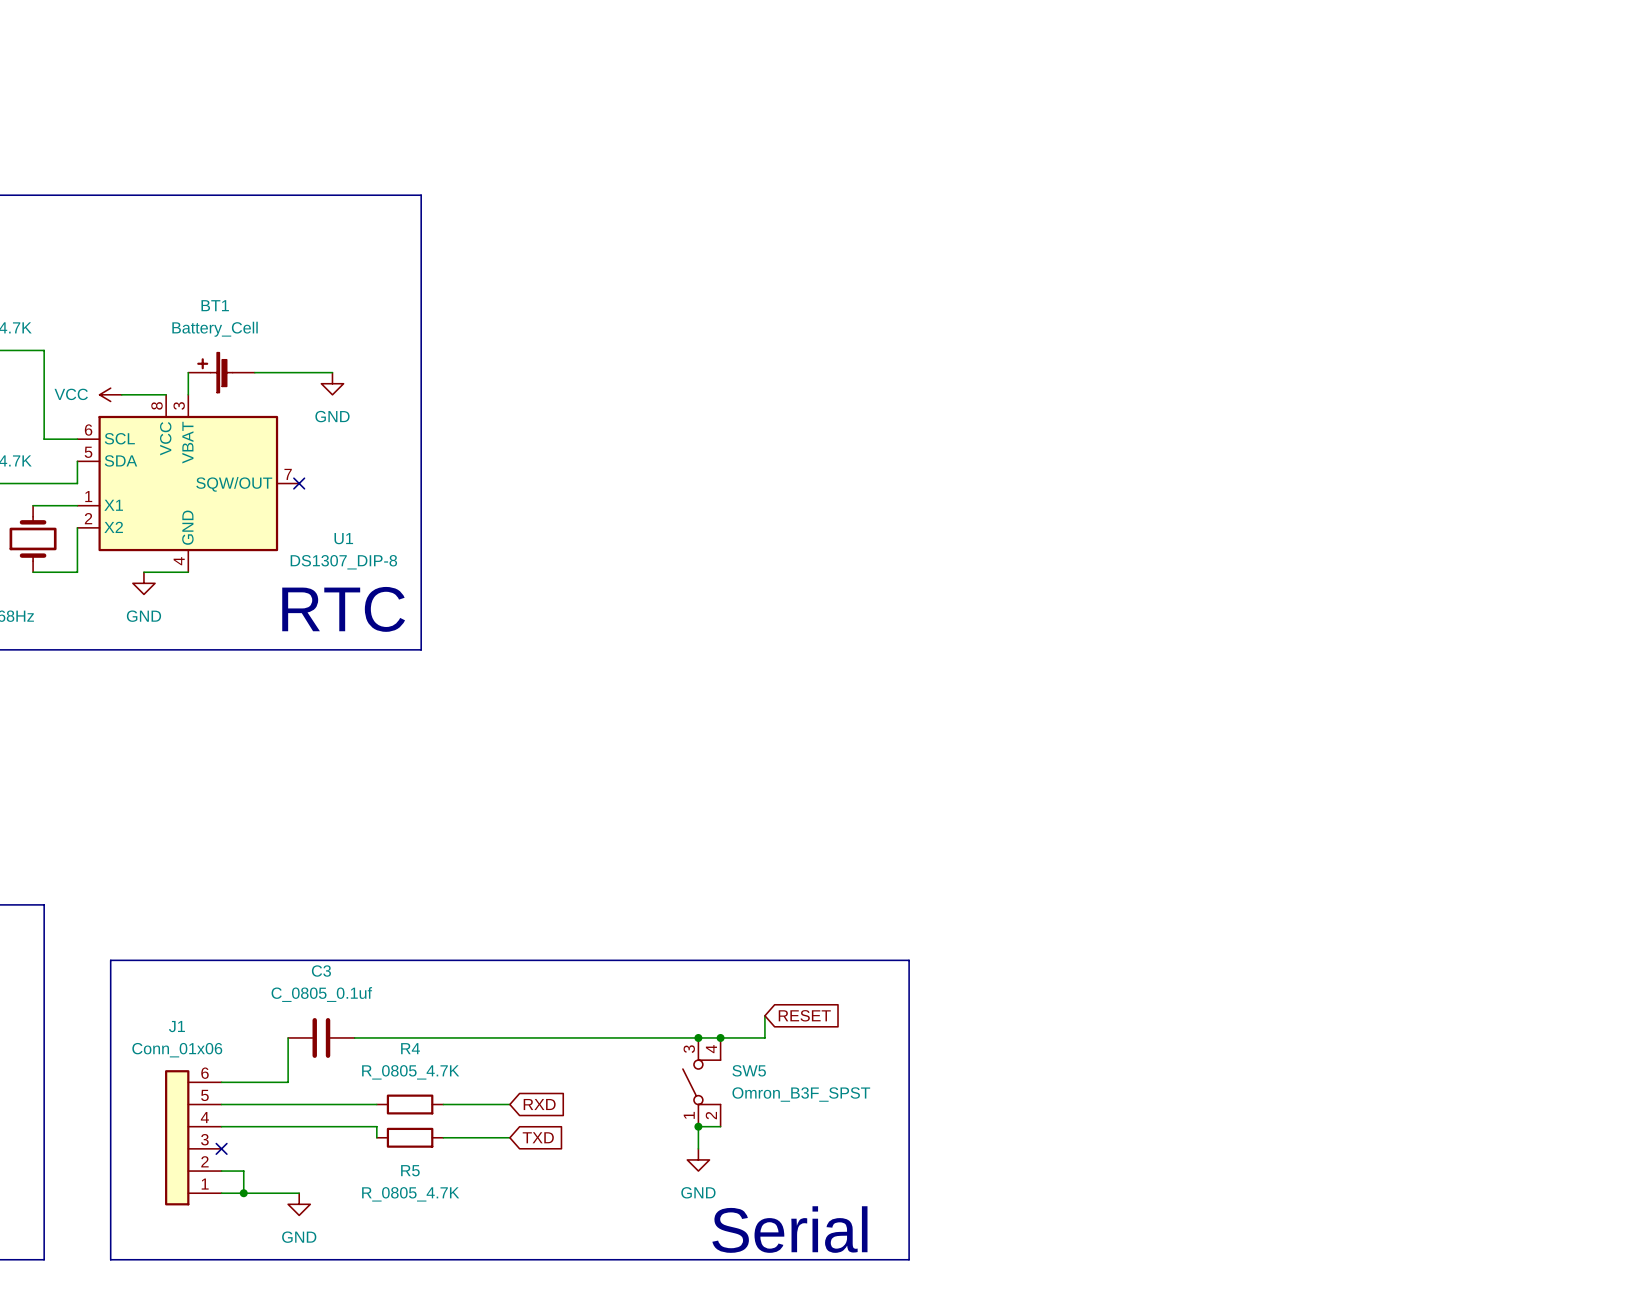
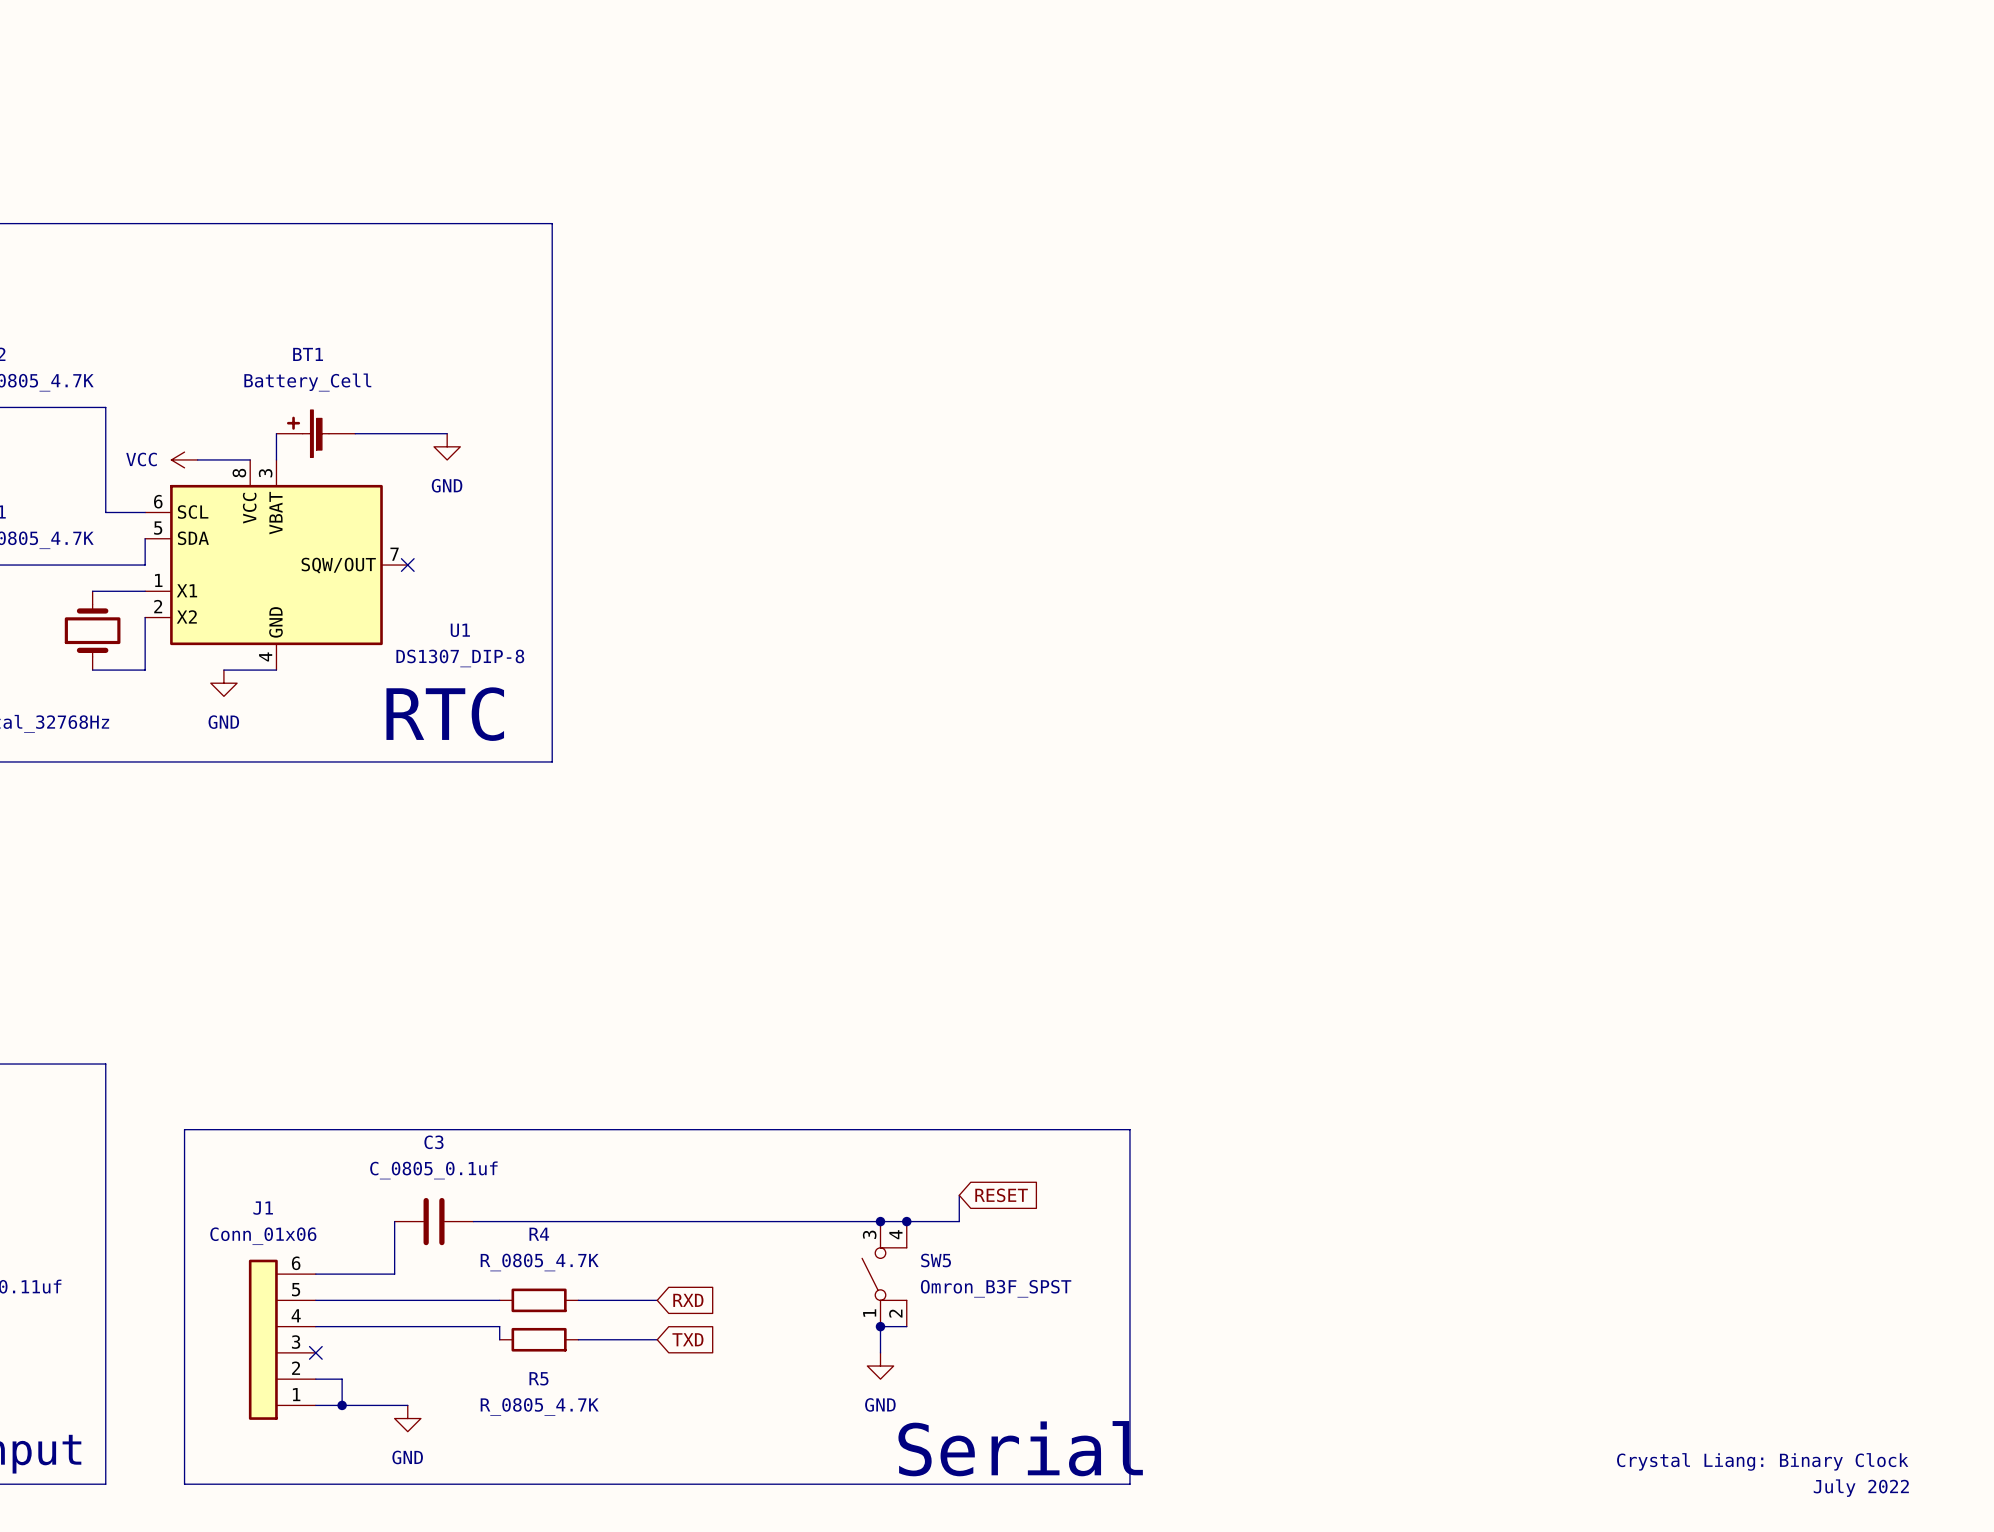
text: none -> Crystal Liang: Binary Clock (1762, 1461)
text: none -> July 2022 (1861, 1488)

